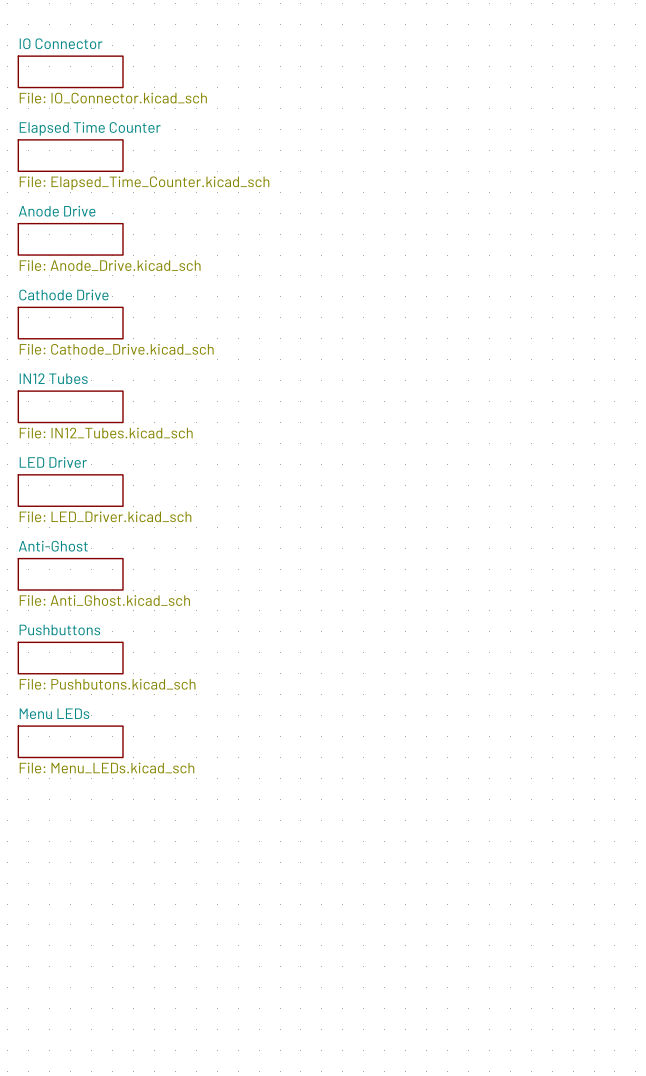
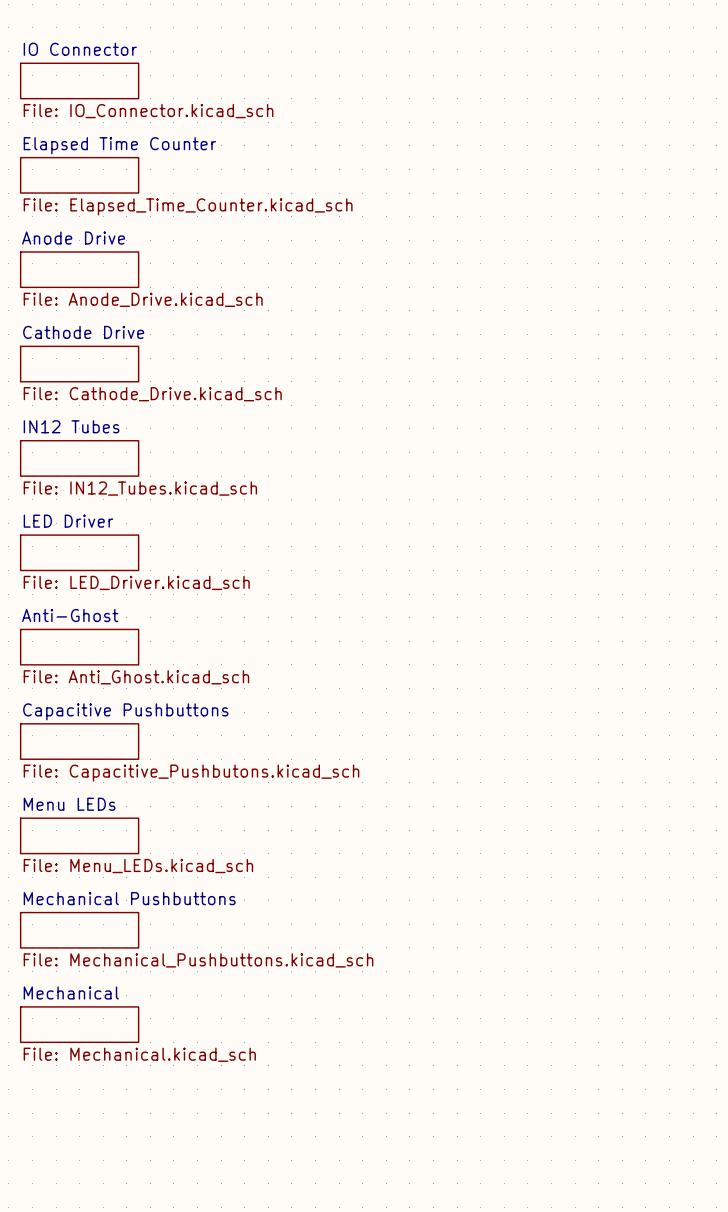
sheet Pushbuttons name: Pushbuttons (59, 630) -> Capacitive Pushbuttons (125, 711)
sheet Pushbuttons value: File: Pushbutons.kicad_sch (107, 684) -> File: Capacitive_Pushbutons.kicad_sch (191, 773)
sheet Mechanical Pushbuttons: none -> File: Mechanical_Pushbuttons.kicad_sch (79, 930)
sheet Mechanical: none -> File: Mechanical.kicad_sch (79, 1024)

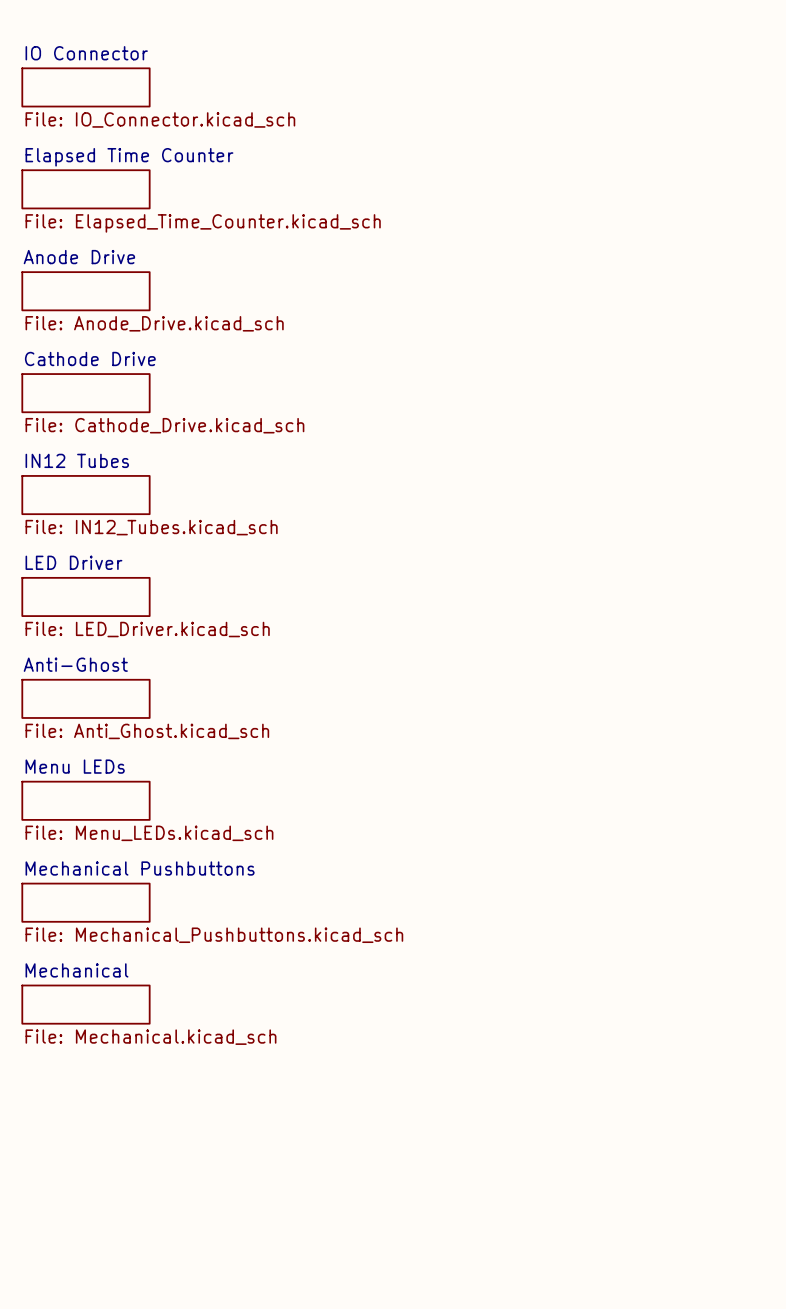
sheet Capacitive Pushbuttons name: Capacitive Pushbuttons (125, 711) -> Menu LEDs (75, 766)
sheet Capacitive Pushbuttons value: File: Capacitive_Pushbutons.kicad_sch (191, 773) -> File: Menu_LEDs.kicad_sch (149, 833)
sheet Menu LEDs name: Menu LEDs (69, 804) -> Mechanical Pushbuttons (140, 868)
sheet Menu LEDs value: File: Menu_LEDs.kicad_sch (138, 866) -> File: Mechanical_Pushbuttons.kicad_sch (214, 935)
sheet Mechanical Pushbuttons name: Mechanical Pushbuttons (129, 898) -> Mechanical (76, 970)
sheet Mechanical Pushbuttons value: File: Mechanical_Pushbuttons.kicad_sch (198, 960) -> File: Mechanical.kicad_sch (150, 1037)
sheet Mechanical: File: Mechanical.kicad_sch (79, 1024) -> none

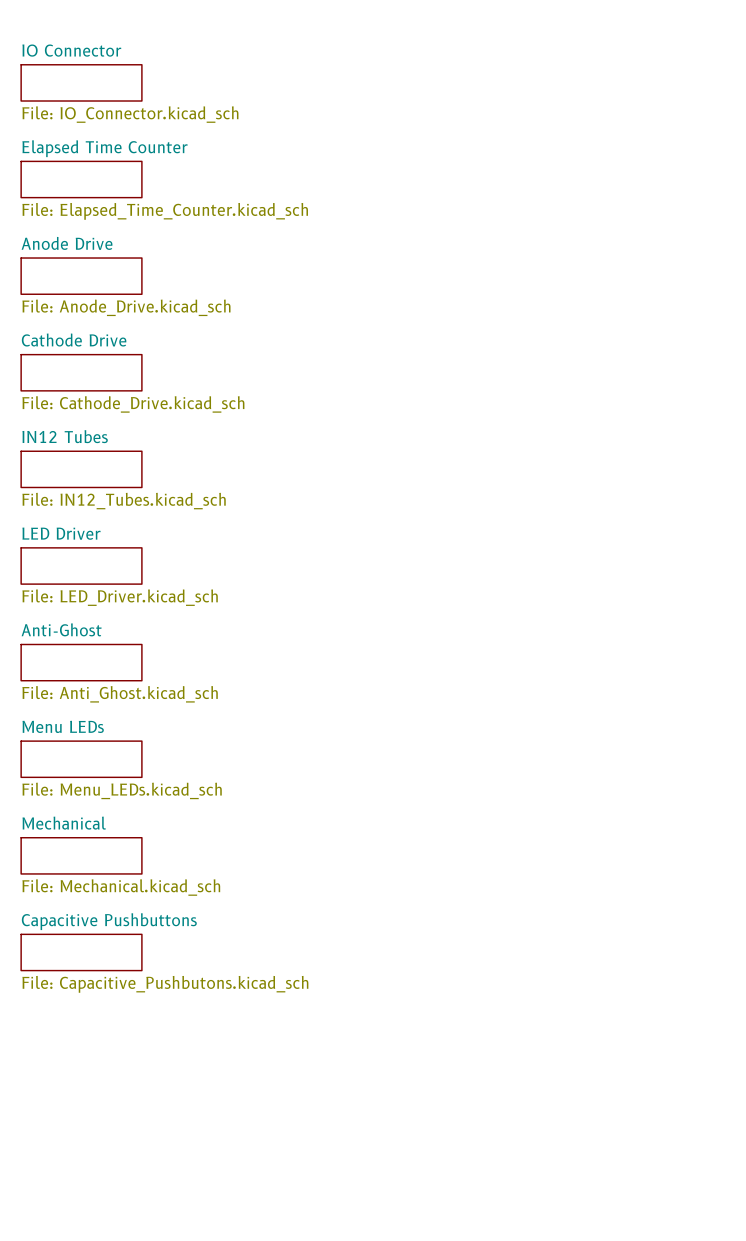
sheet Mechanical Pushbuttons name: Mechanical Pushbuttons (140, 868) -> Mechanical (64, 823)
sheet Mechanical Pushbuttons value: File: Mechanical_Pushbuttons.kicad_sch (214, 935) -> File: Mechanical.kicad_sch (121, 887)
sheet Mechanical name: Mechanical (76, 970) -> Capacitive Pushbuttons (109, 921)
sheet Mechanical value: File: Mechanical.kicad_sch (150, 1037) -> File: Capacitive_Pushbutons.kicad_sch (165, 984)

